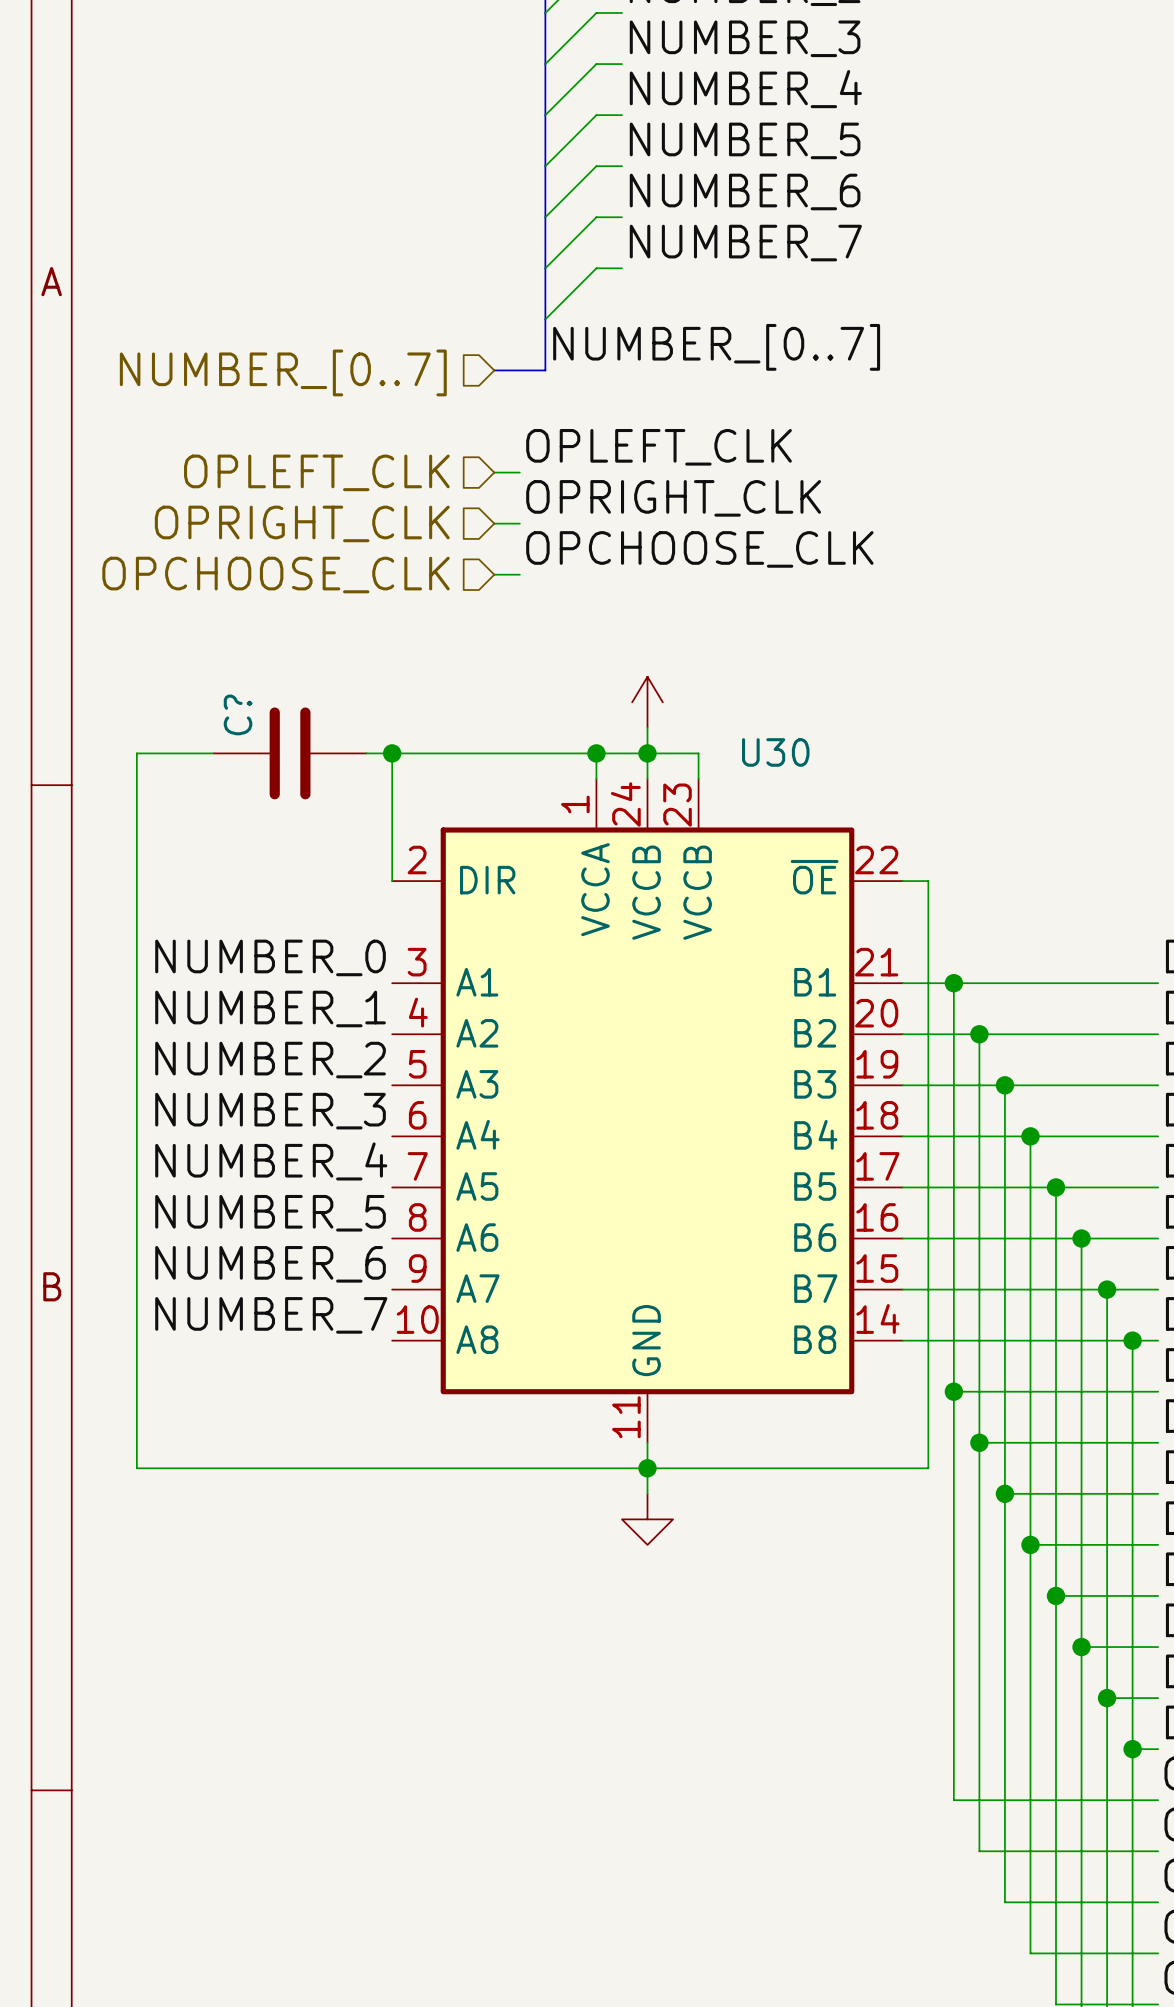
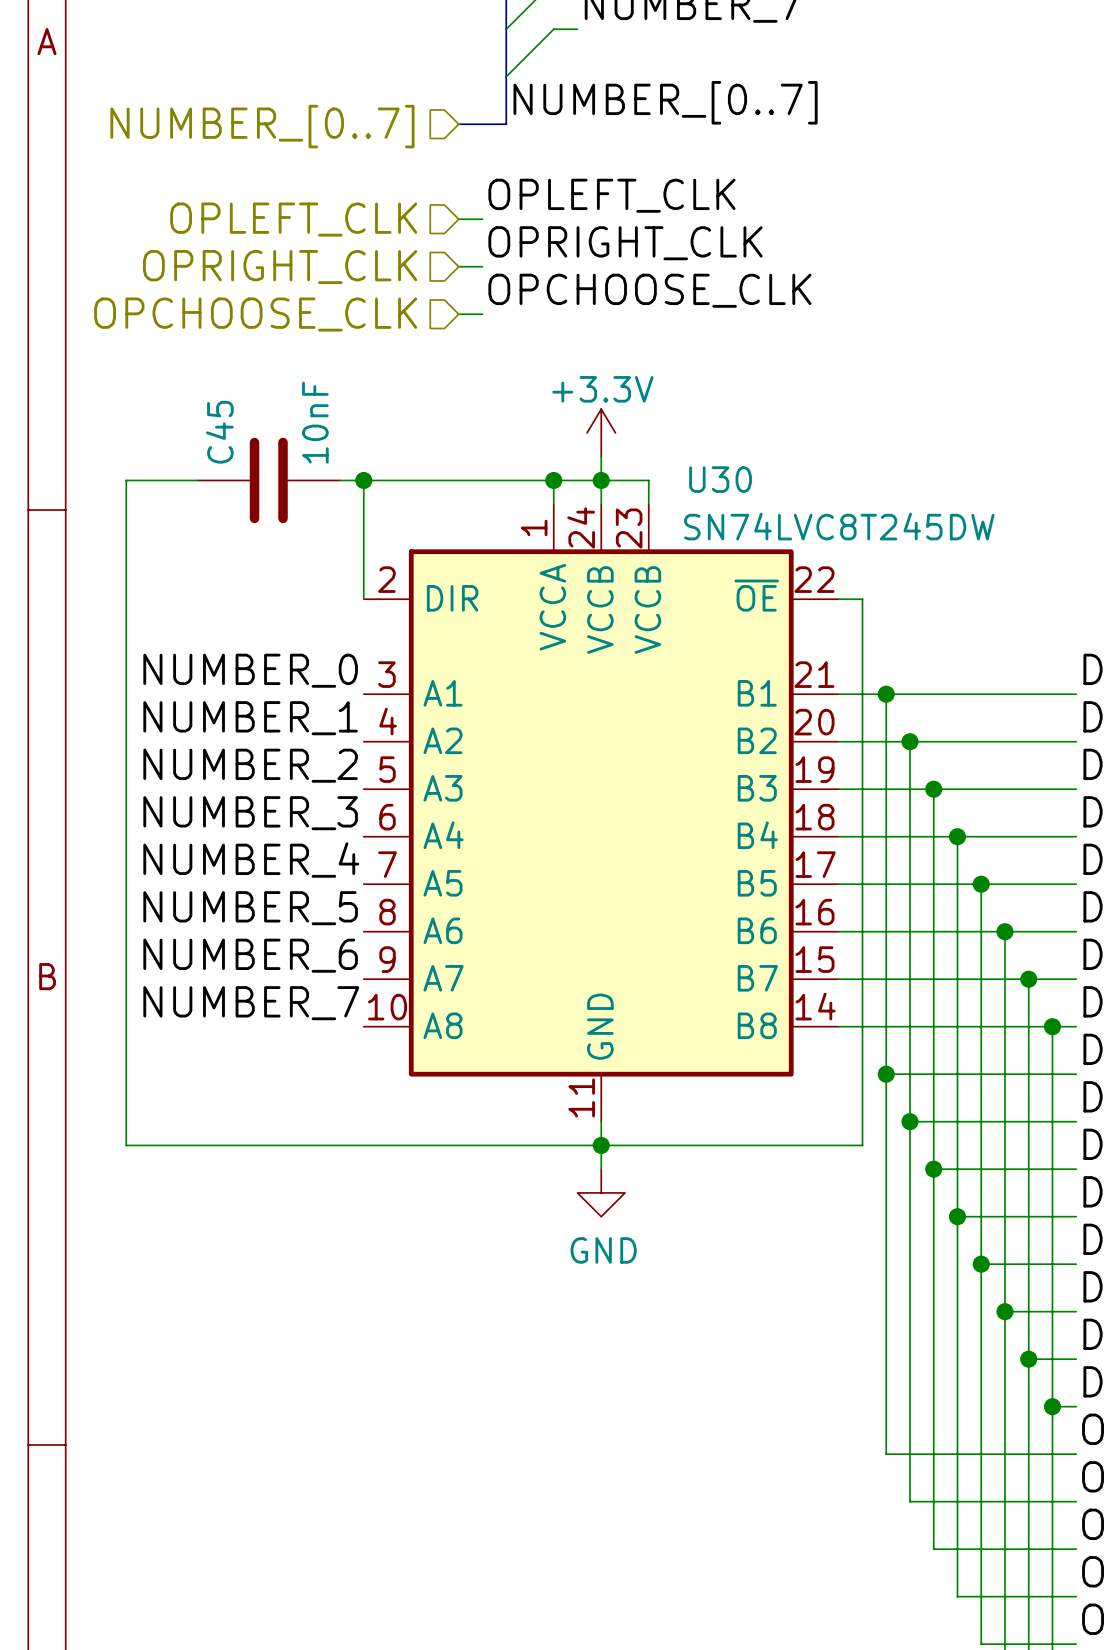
power symbol text: none -> +3.3V (602, 389)
C? value: none -> 10nF (315, 422)
C? name: C? (238, 714) -> C45 (219, 432)
U30 value: none -> SN74LVC8T245DW (839, 526)
power symbol text: none -> GND (603, 1250)

